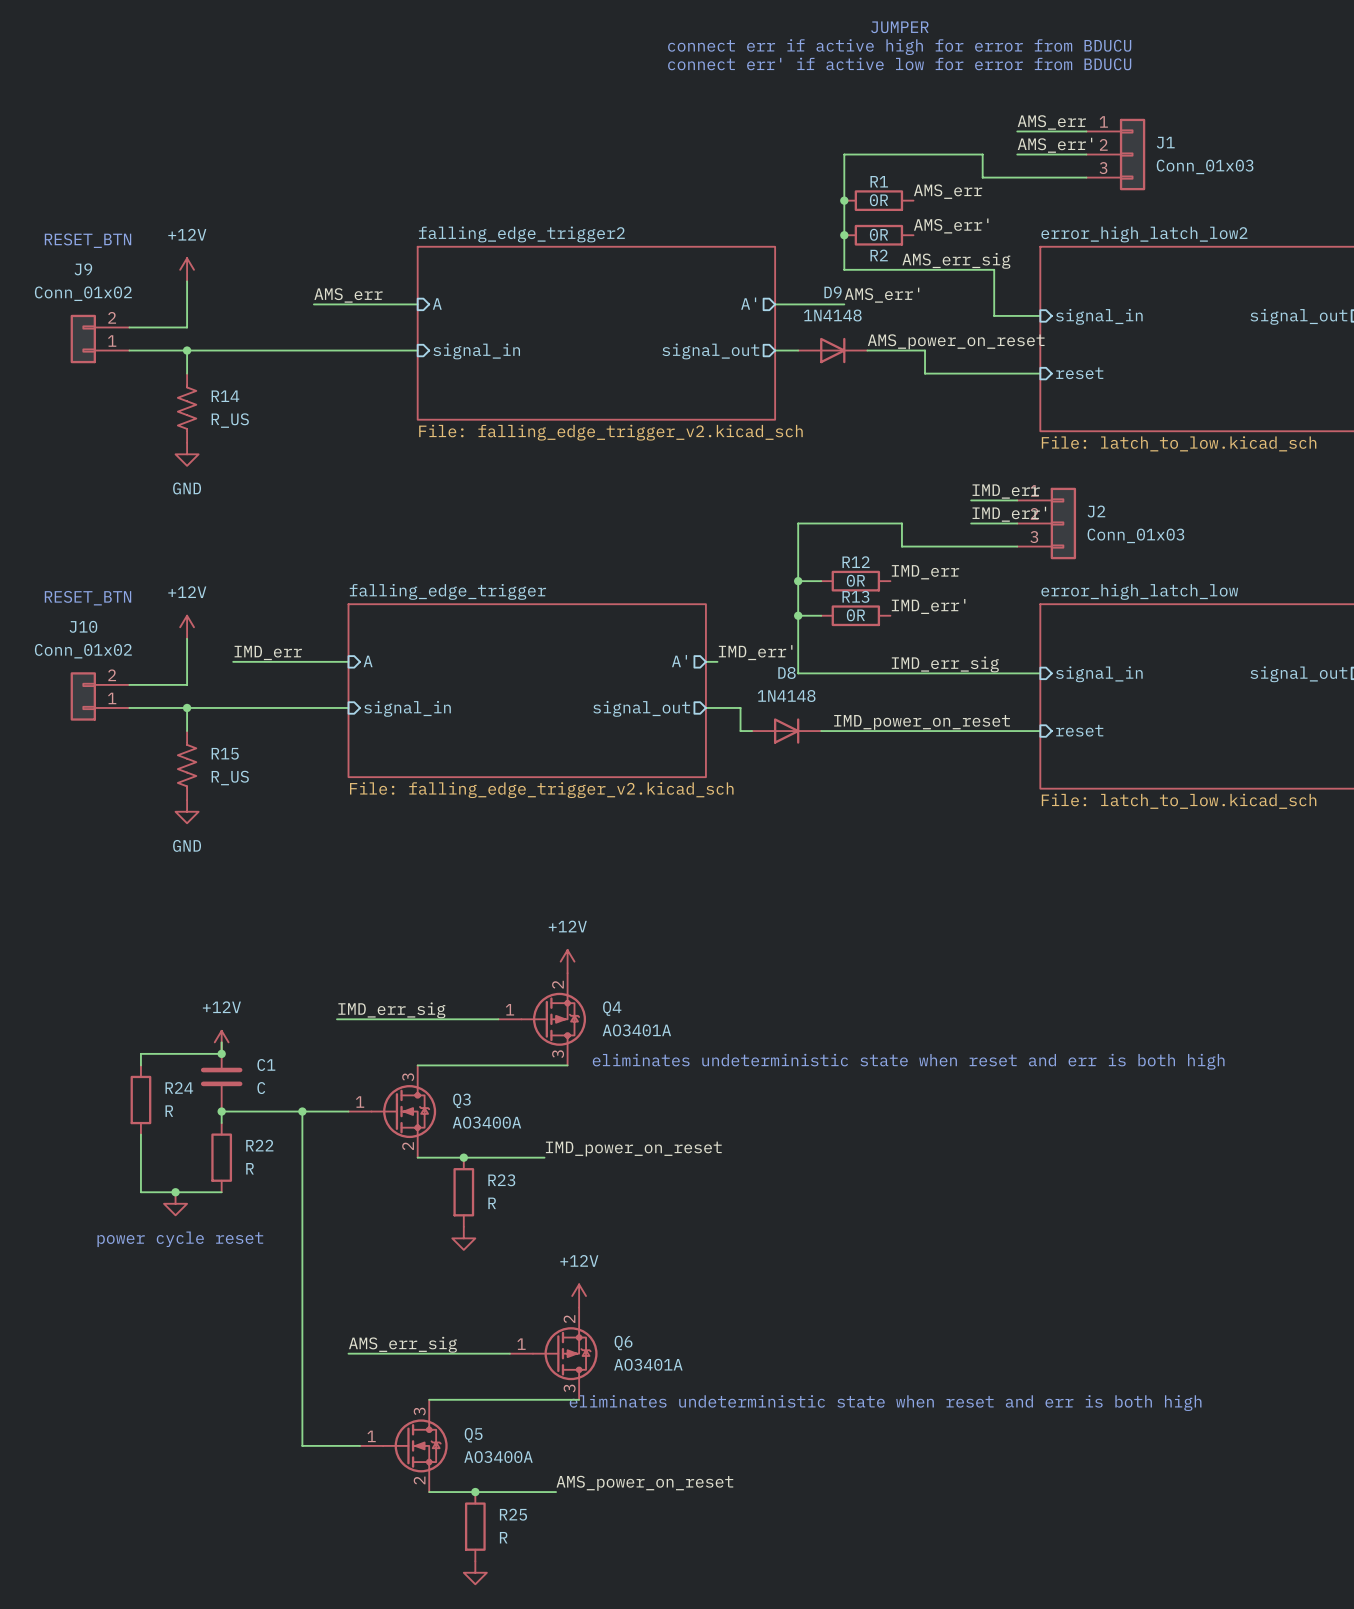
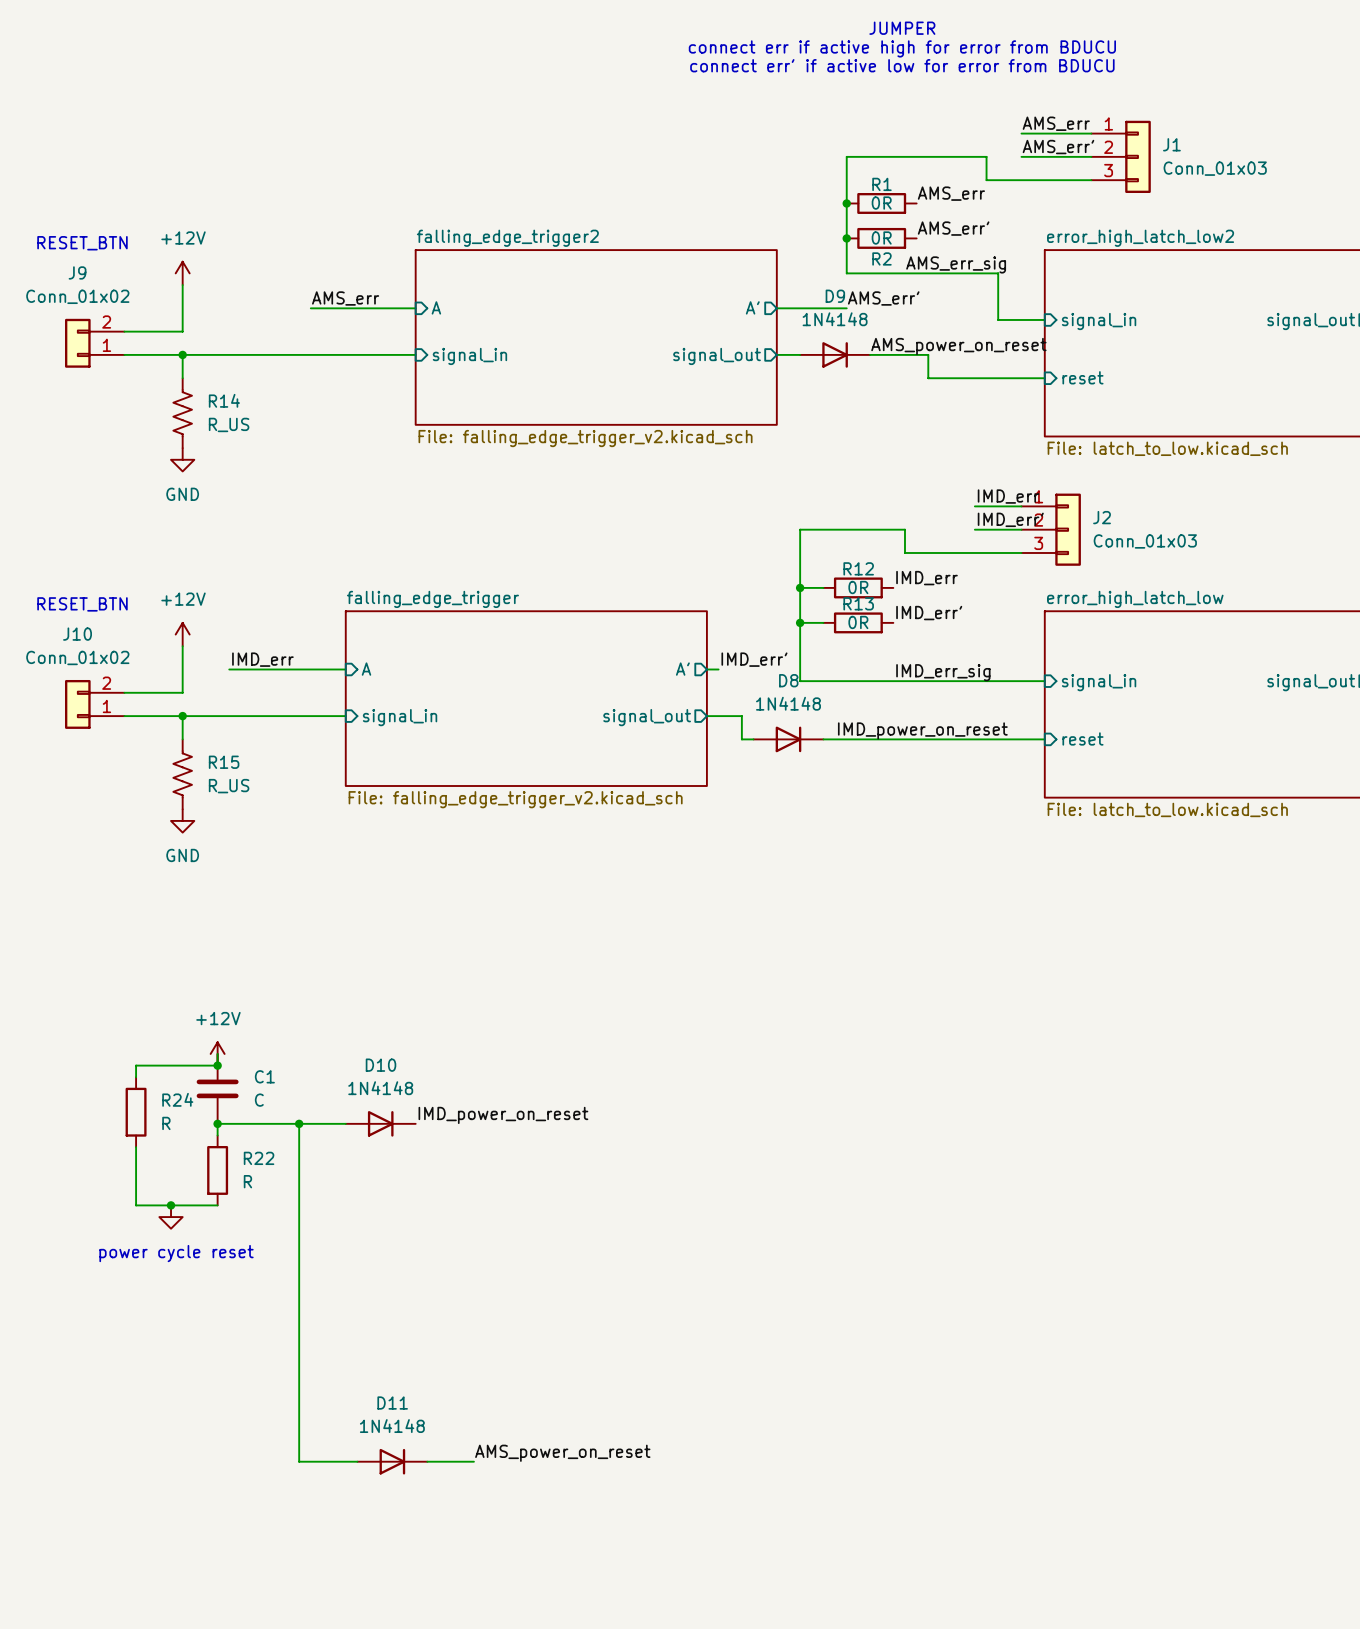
power symbol: +12V (567, 961) -> none
label: IMD_err_sig (391, 1010) -> none
wire: (336, 1019) (498, 1019) -> none
Q4: AO3401A (542, 1019) -> none
text: eliminates undeterministic state when reset and err is both high (908, 1061) -> none
wire: (417, 1065) (567, 1065) -> none
D10: none -> 1N4148 (380, 1123)
Q3: AO3400A (392, 1111) -> none
label position: IMD_power_on_reset (633, 1149) -> IMD_power_on_reset (503, 1115)
wire: (417, 1157) (544, 1157) -> none
junction: (463, 1157) -> none
R23: R (463, 1192) -> none
power symbol: (463, 1238) -> none
power symbol: +12V (579, 1296) -> none
label: AMS_err_sig (402, 1344) -> none
wire: (348, 1353) (509, 1353) -> none
Q6: AO3401A (553, 1353) -> none
wire: (429, 1399) (579, 1399) -> none
text: eliminates undeterministic state when reset and err is both high (885, 1403) -> none
D11: none -> 1N4148 (392, 1461)
Q5: AO3400A (403, 1445) -> none
wire: none -> (427, 1461) (473, 1461)
label position: AMS_power_on_reset (644, 1483) -> AMS_power_on_reset (562, 1453)
wire: (429, 1492) (556, 1492) -> none
junction: (475, 1492) -> none
R25: R (475, 1526) -> none
power symbol: (475, 1572) -> none

